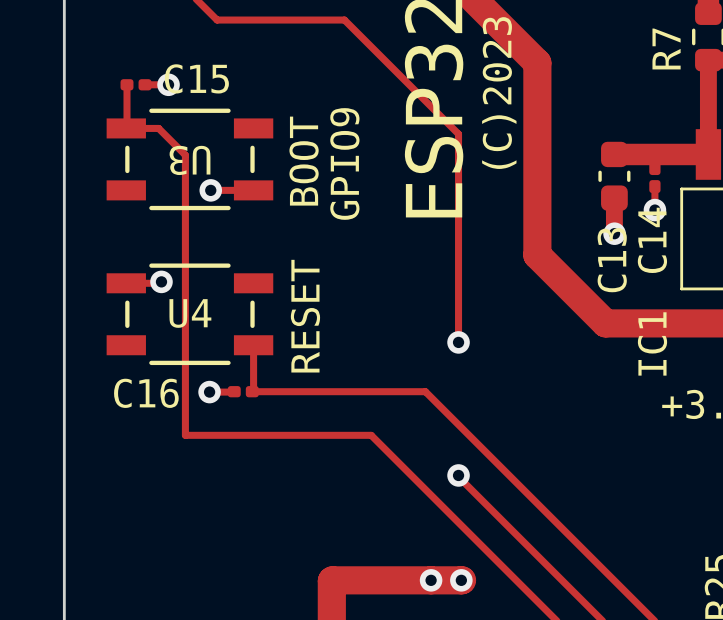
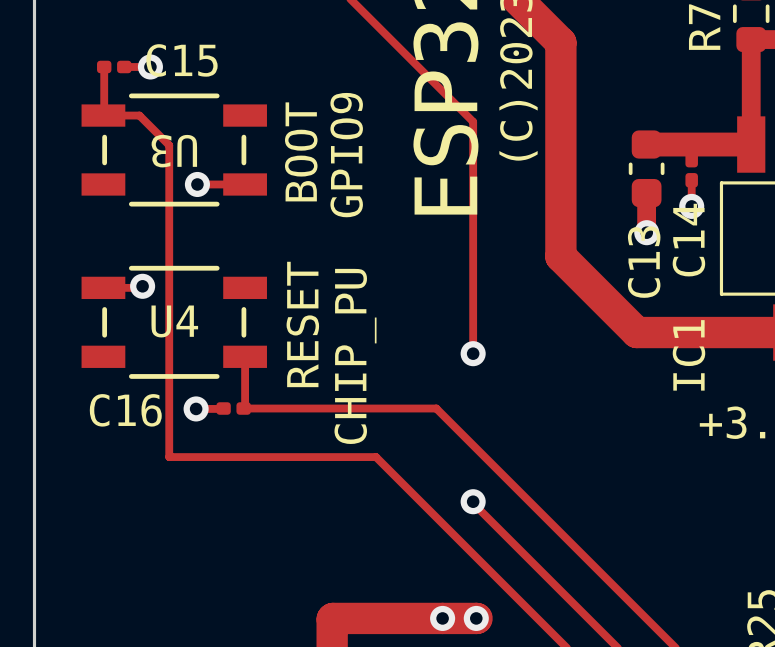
text: none -> CHIP_PU (355, 356)

